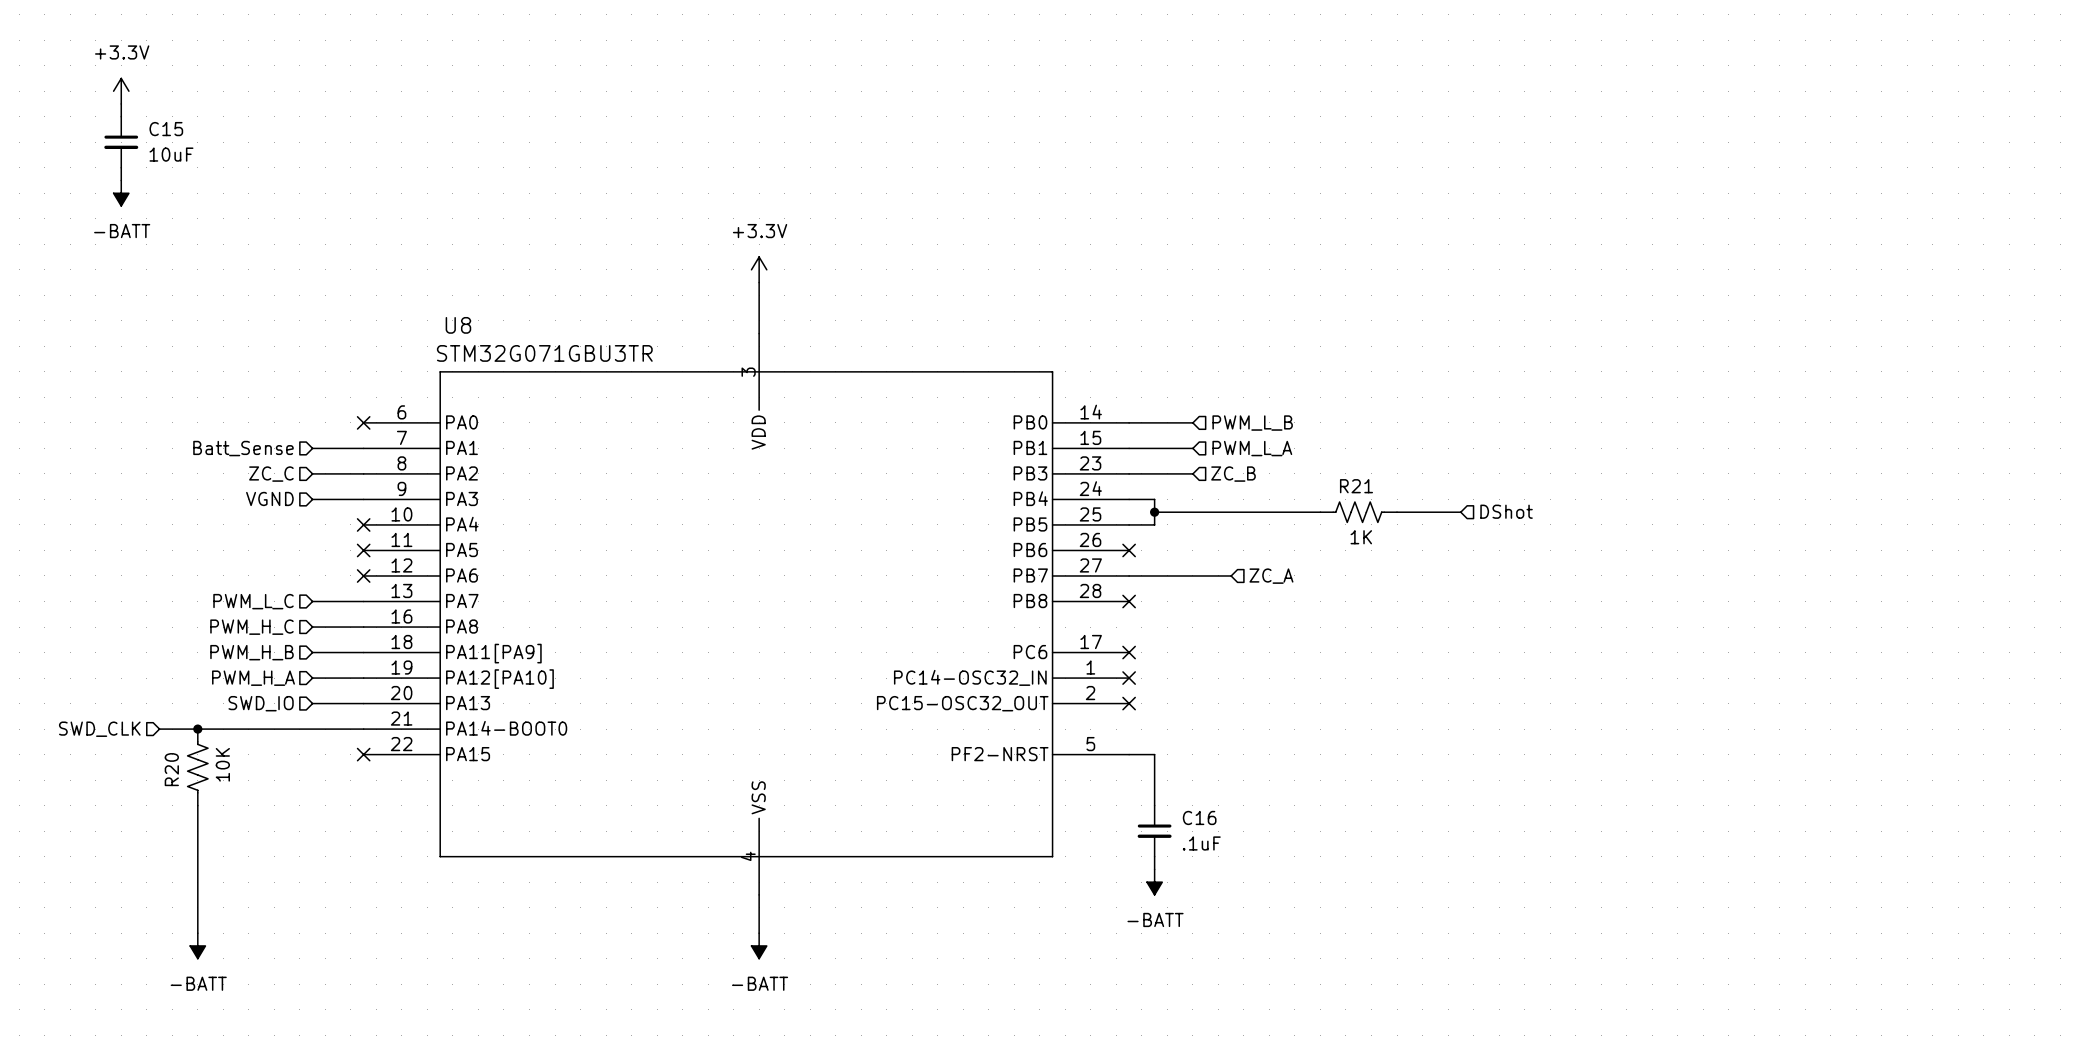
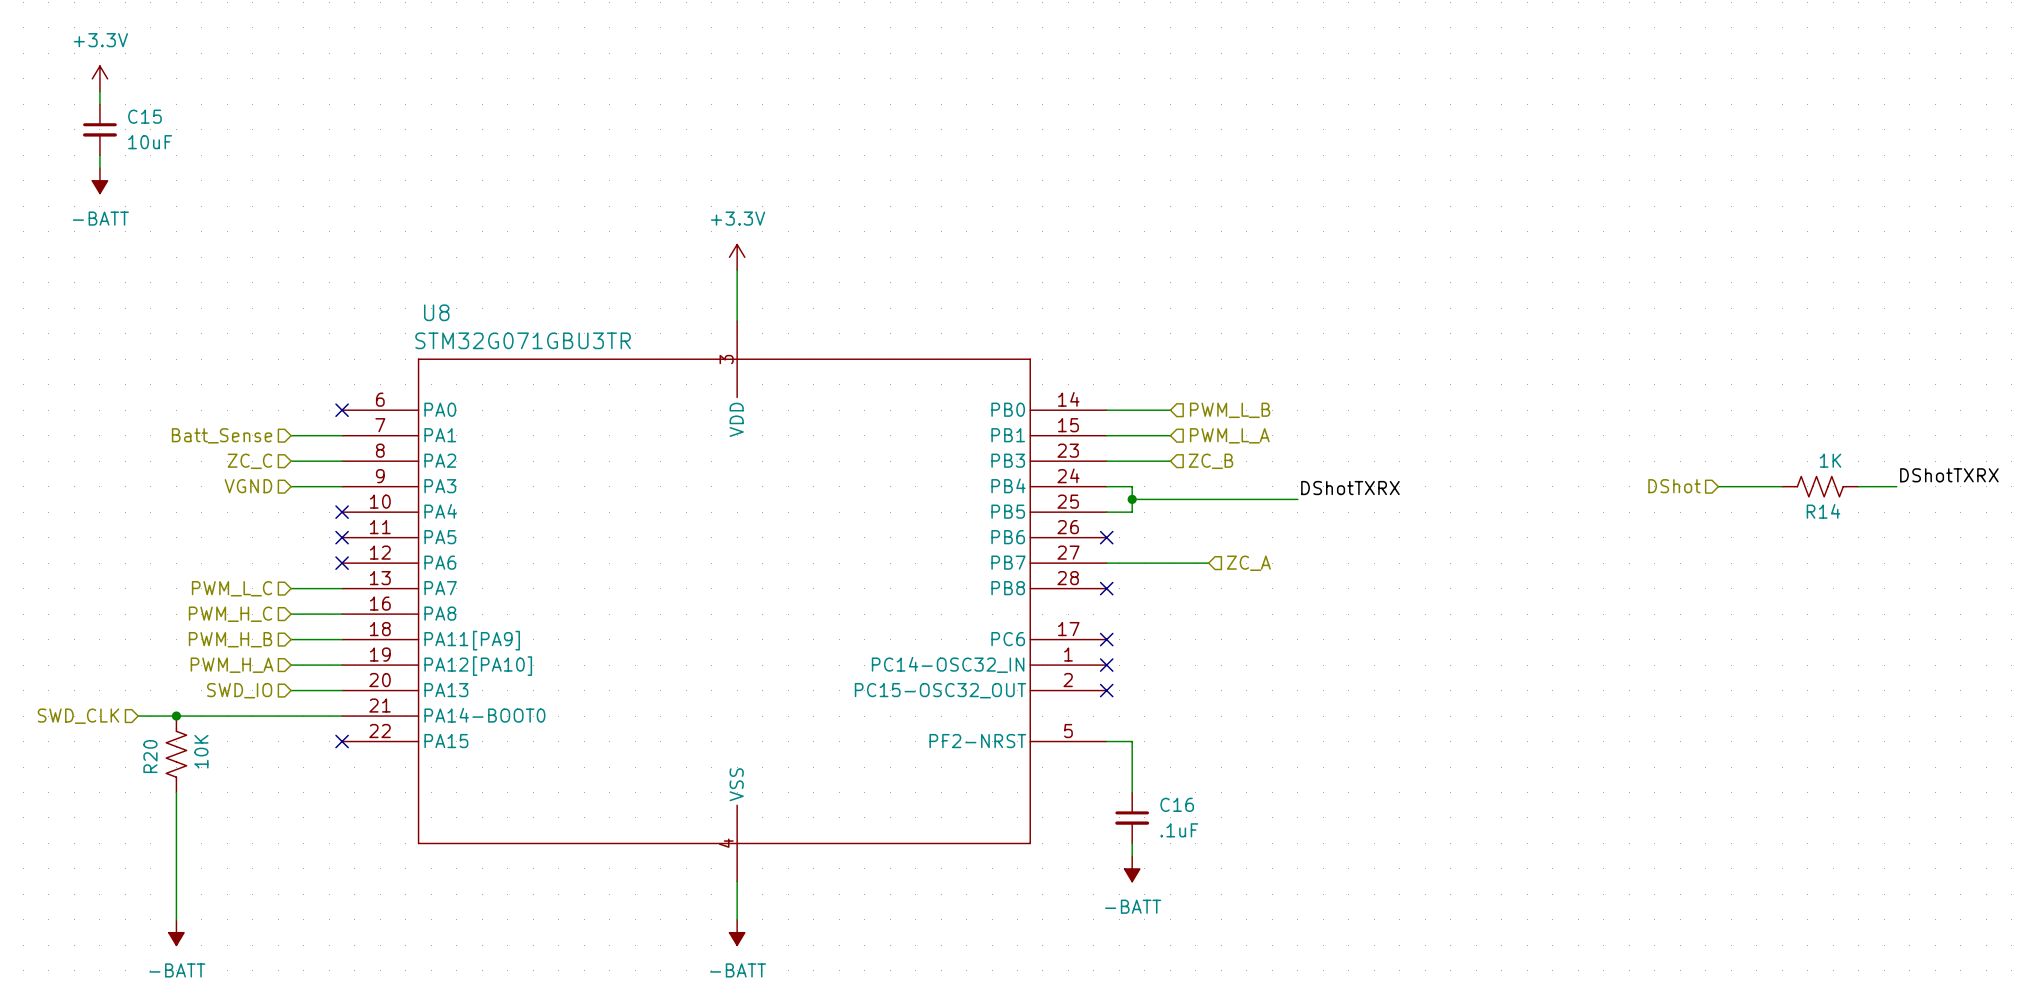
label: none -> DShotTXRX (1949, 475)
wire: none -> (1718, 486) (1782, 486)
R14: none -> 1K (1820, 486)
wire: none -> (1858, 486) (1896, 486)
label: none -> DShotTXRX (1350, 488)
hierarchical label rotation: 0° (1506, 511) -> 180° (1674, 486)
hierarchical label position: DShot (1506, 511) -> DShot (1674, 486)
R21: 1K (1358, 512) -> none
wire: (1397, 512) (1460, 512) -> none

